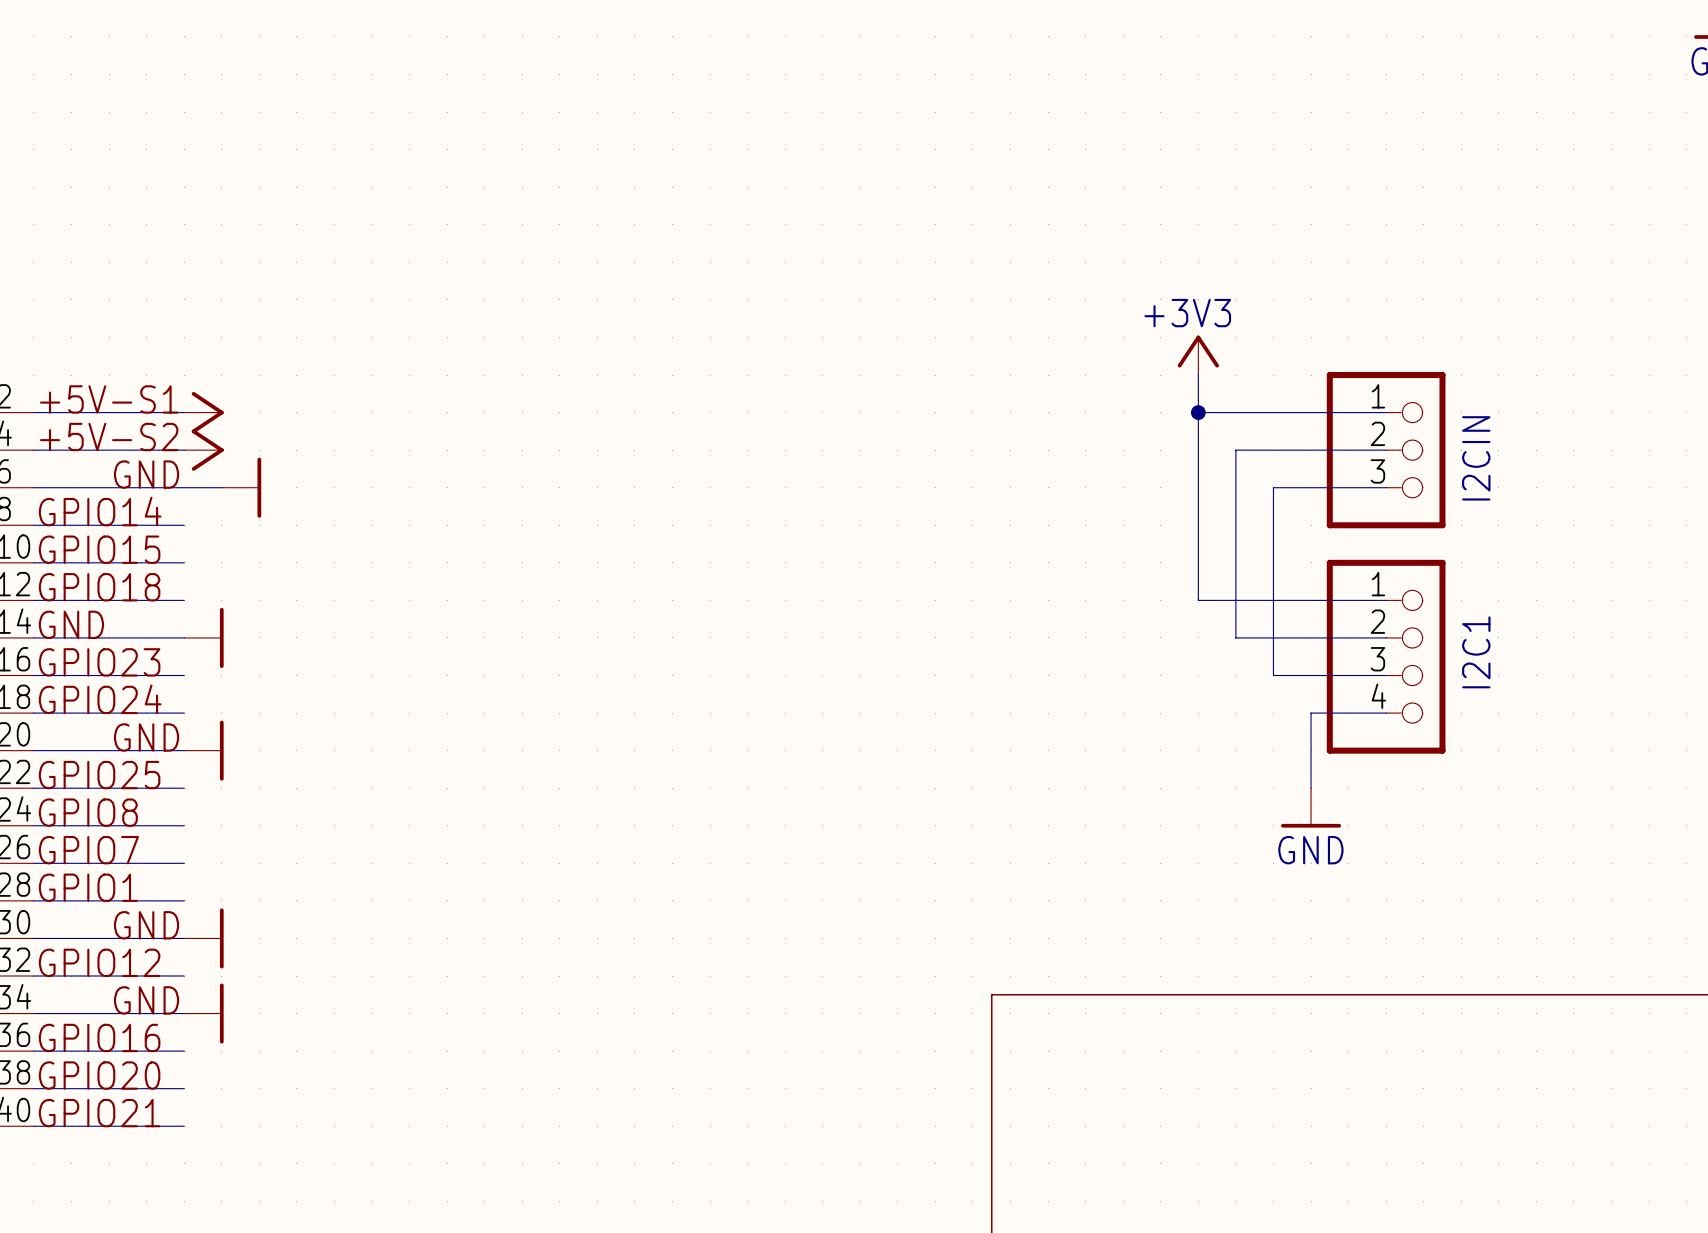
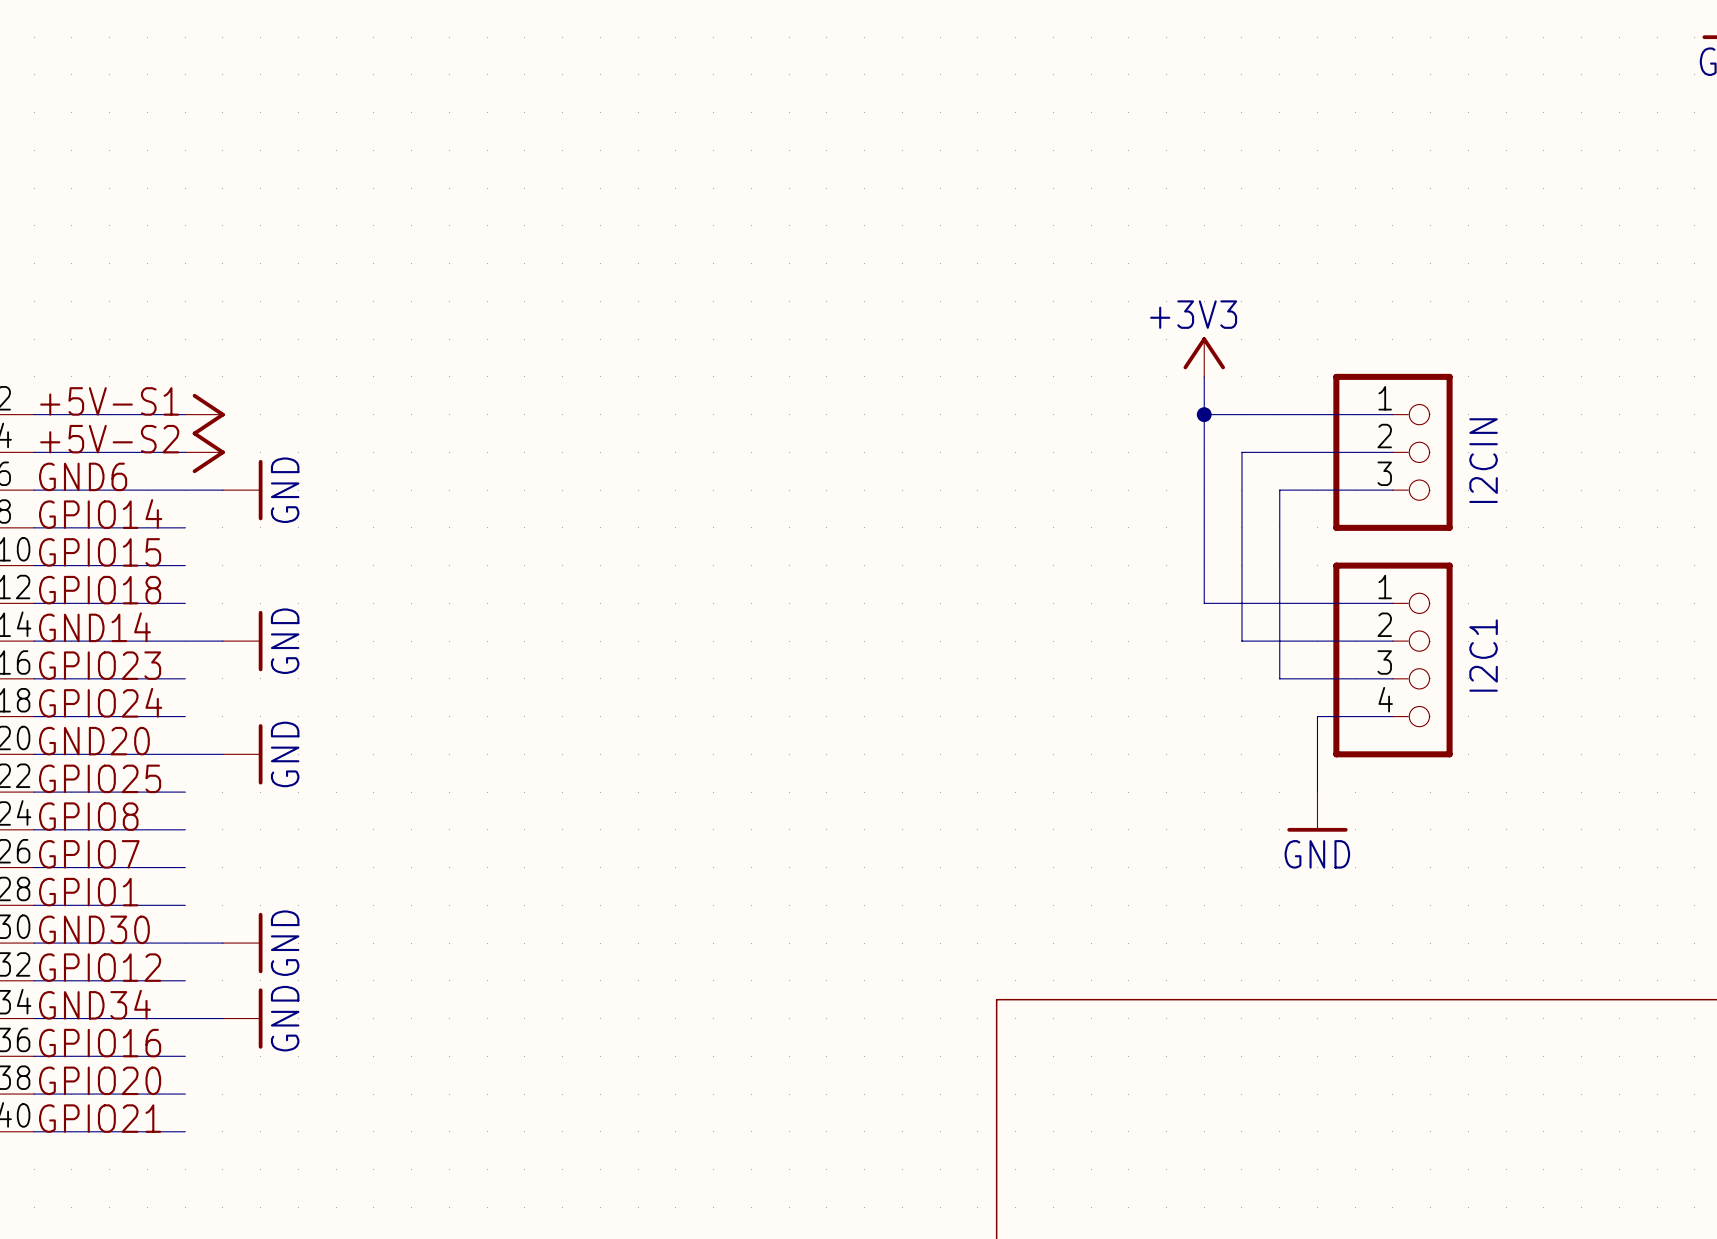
label: GND (146, 474) -> GND6 (83, 476)
power symbol text: none -> GND (285, 490)
label: GND (71, 624) -> GND14 (94, 627)
power symbol: (203, 637) -> none
power symbol: none -> GND (242, 641)
label: GND (146, 737) -> GND20 (94, 741)
power symbol: (203, 750) -> none
power symbol: none -> GND (242, 754)
label: GND (146, 925) -> GND30 (94, 929)
power symbol: (203, 938) -> none
power symbol: none -> GND (242, 943)
label: GND (146, 1000) -> GND34 (94, 1004)
power symbol: (203, 1013) -> none
power symbol: none -> GND (242, 1018)

